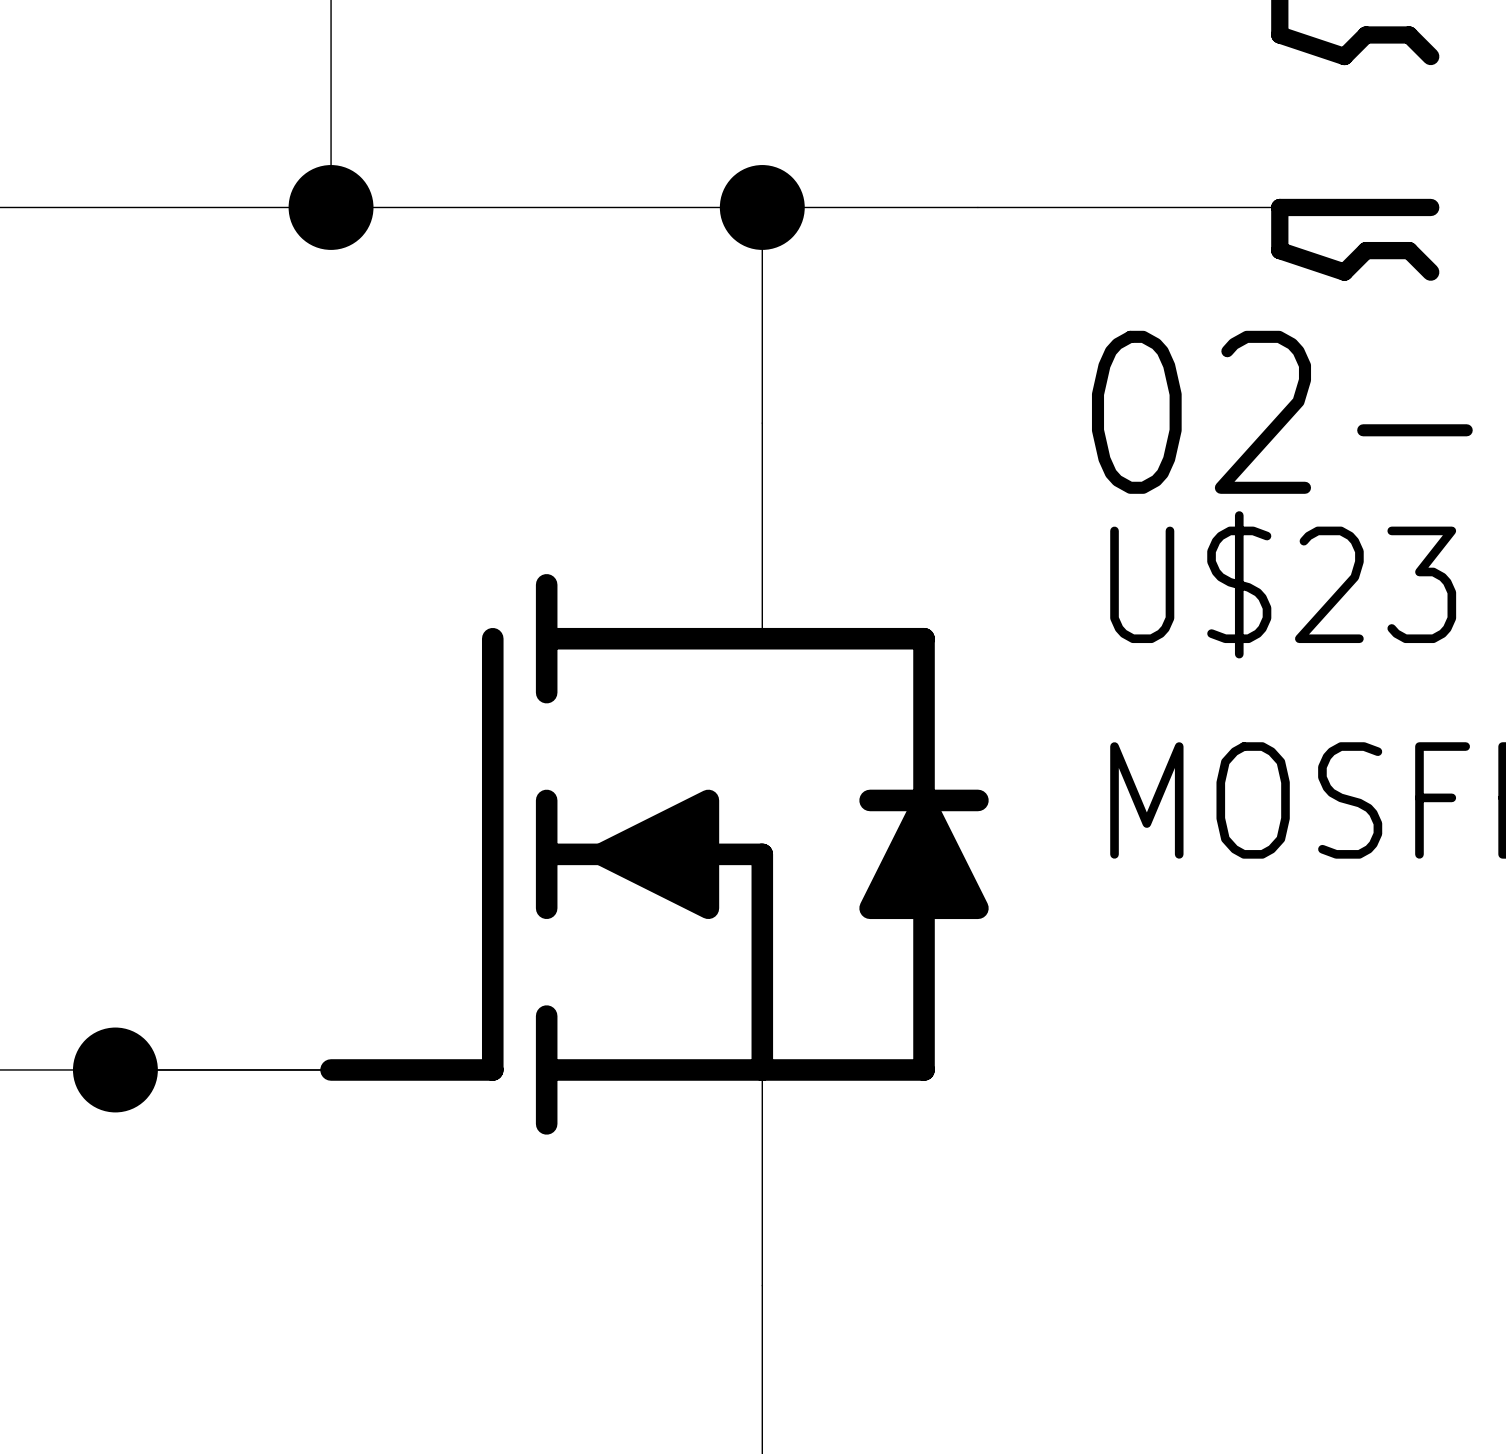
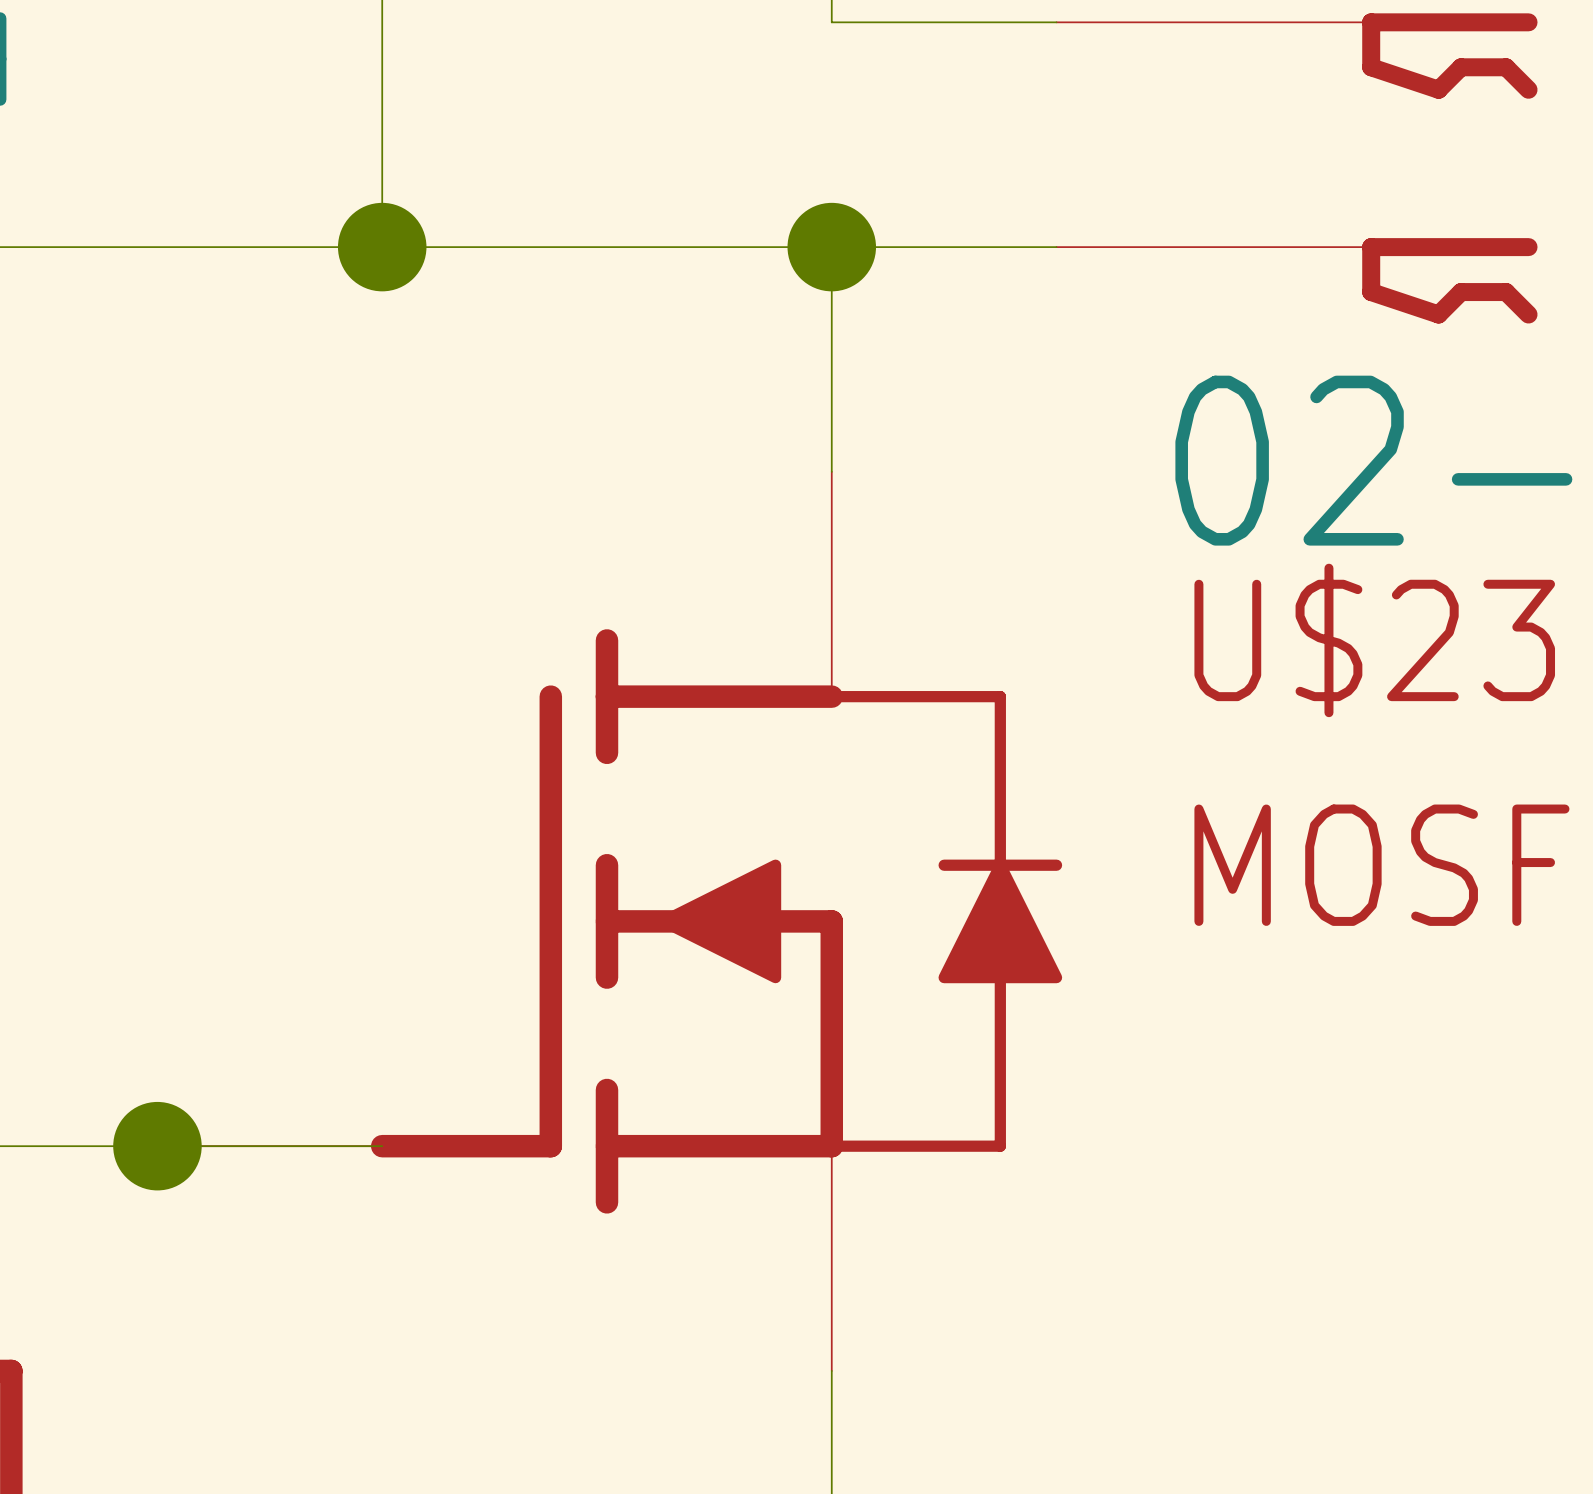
U$23 symbol: [115, 423, 989, 1286] -> [157, 471, 1063, 1371]

